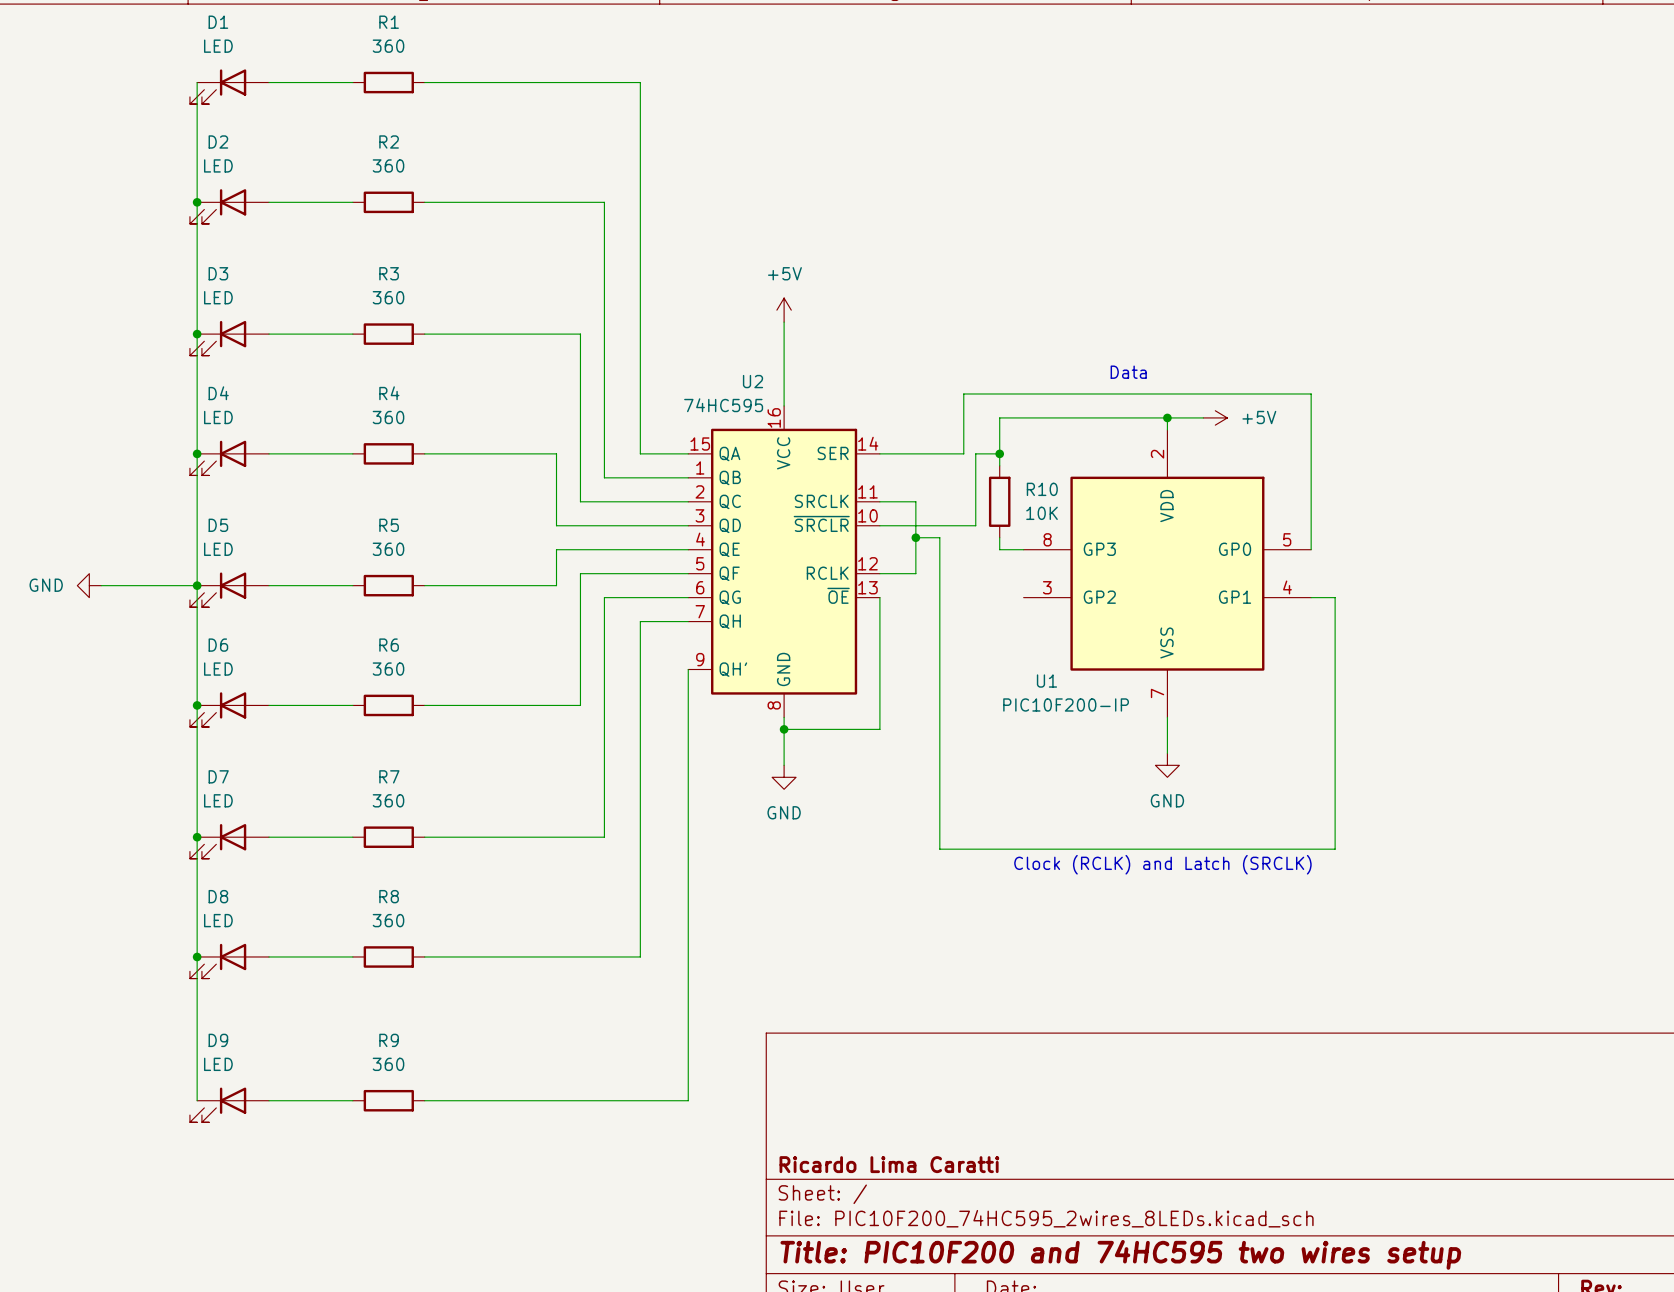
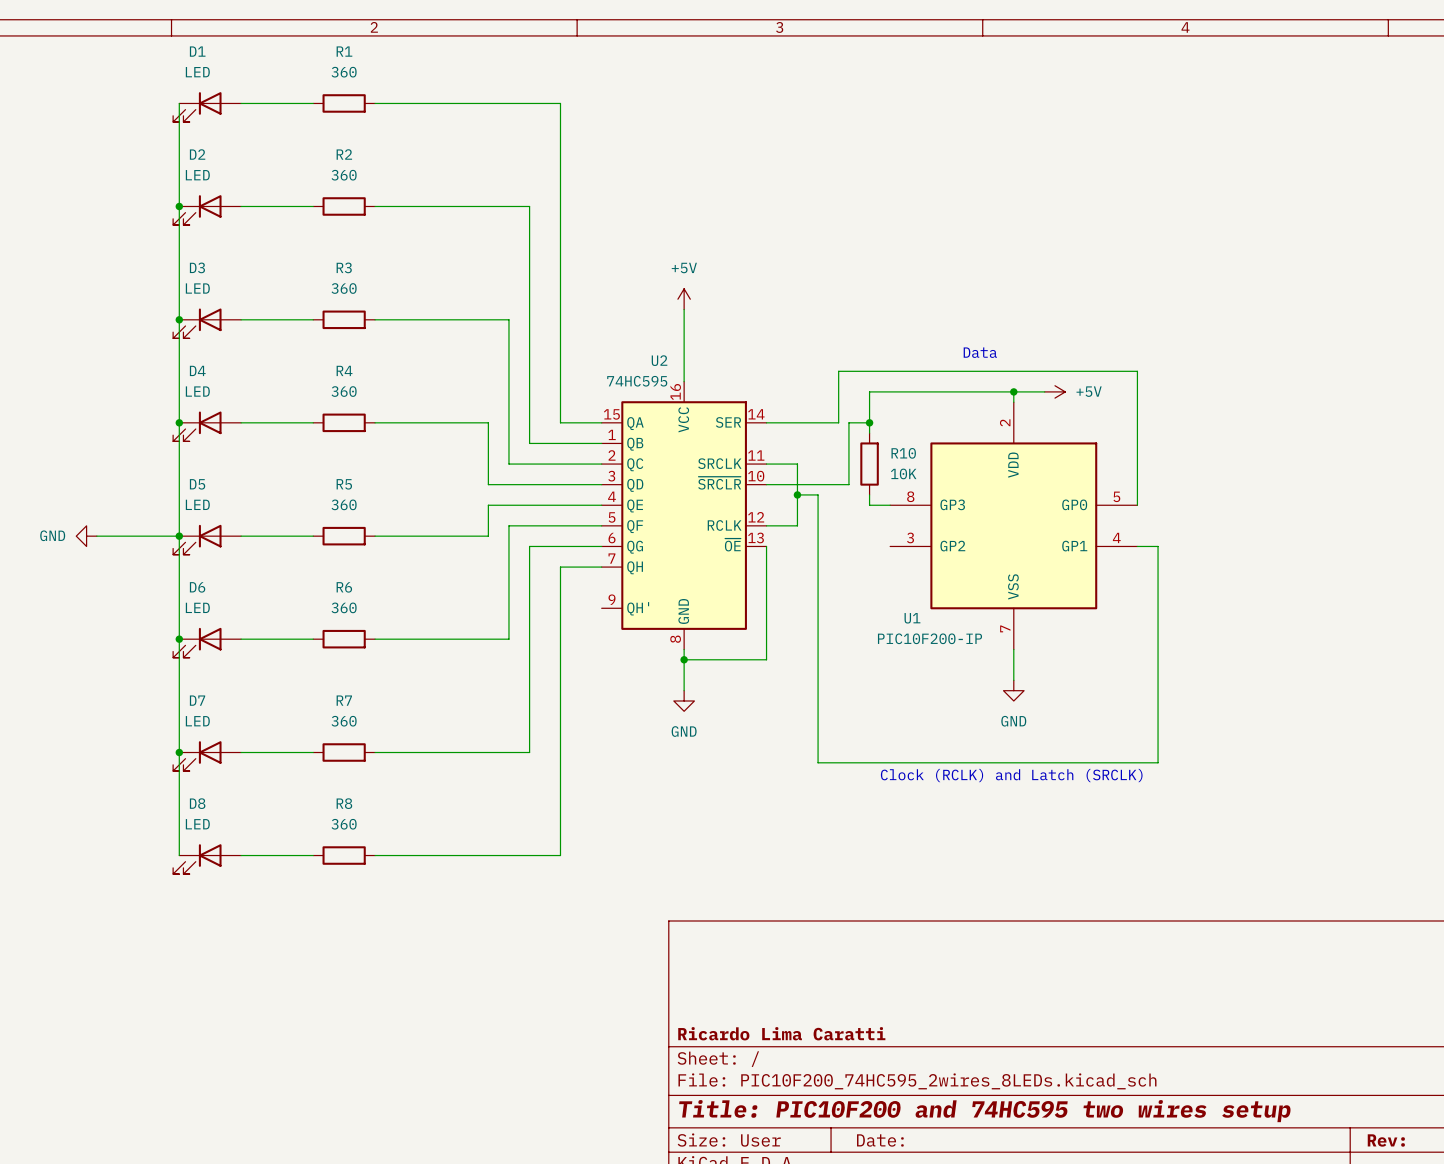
wire: (688, 669) (688, 1100) (424, 1100) -> none
wire: (197, 956) (197, 1100) -> none
junction: (197, 956) -> none
wire: (269, 1100) (352, 1100) -> none
R9: 360 (388, 1100) -> none
D9: LED (229, 1104) -> none

